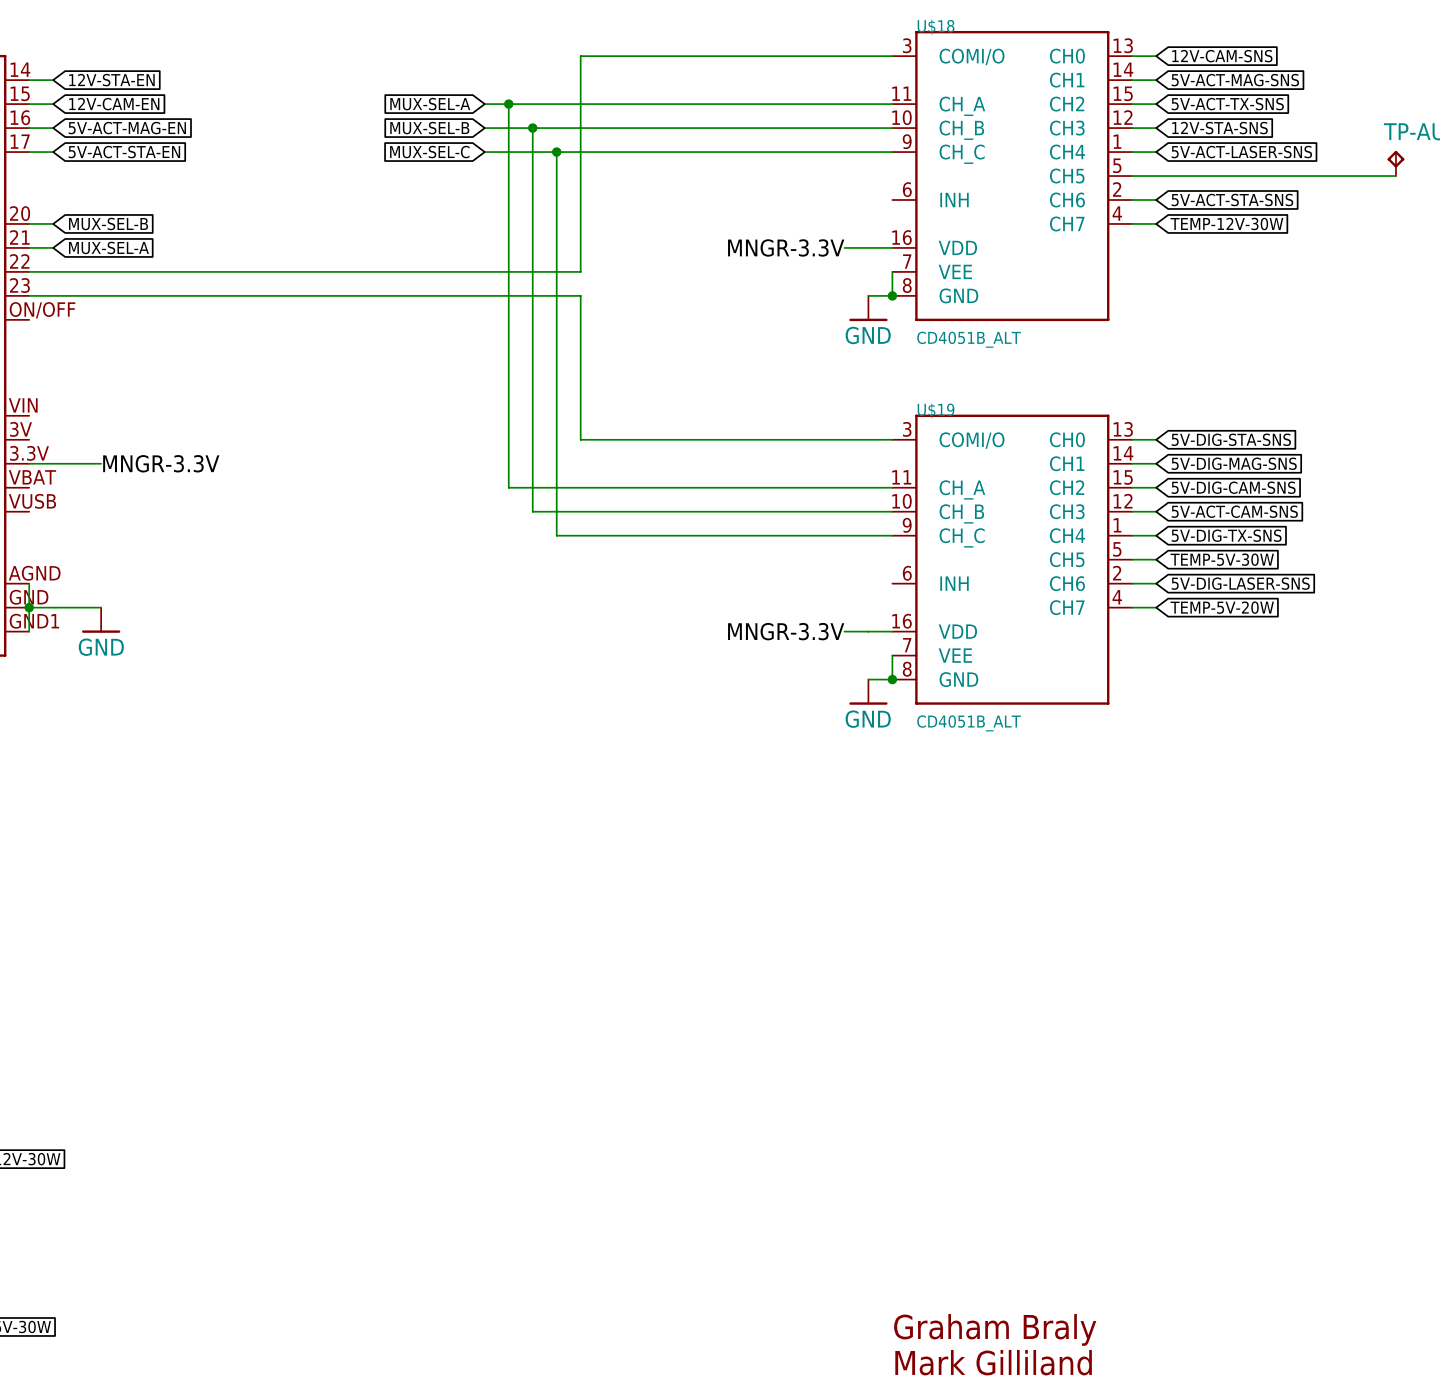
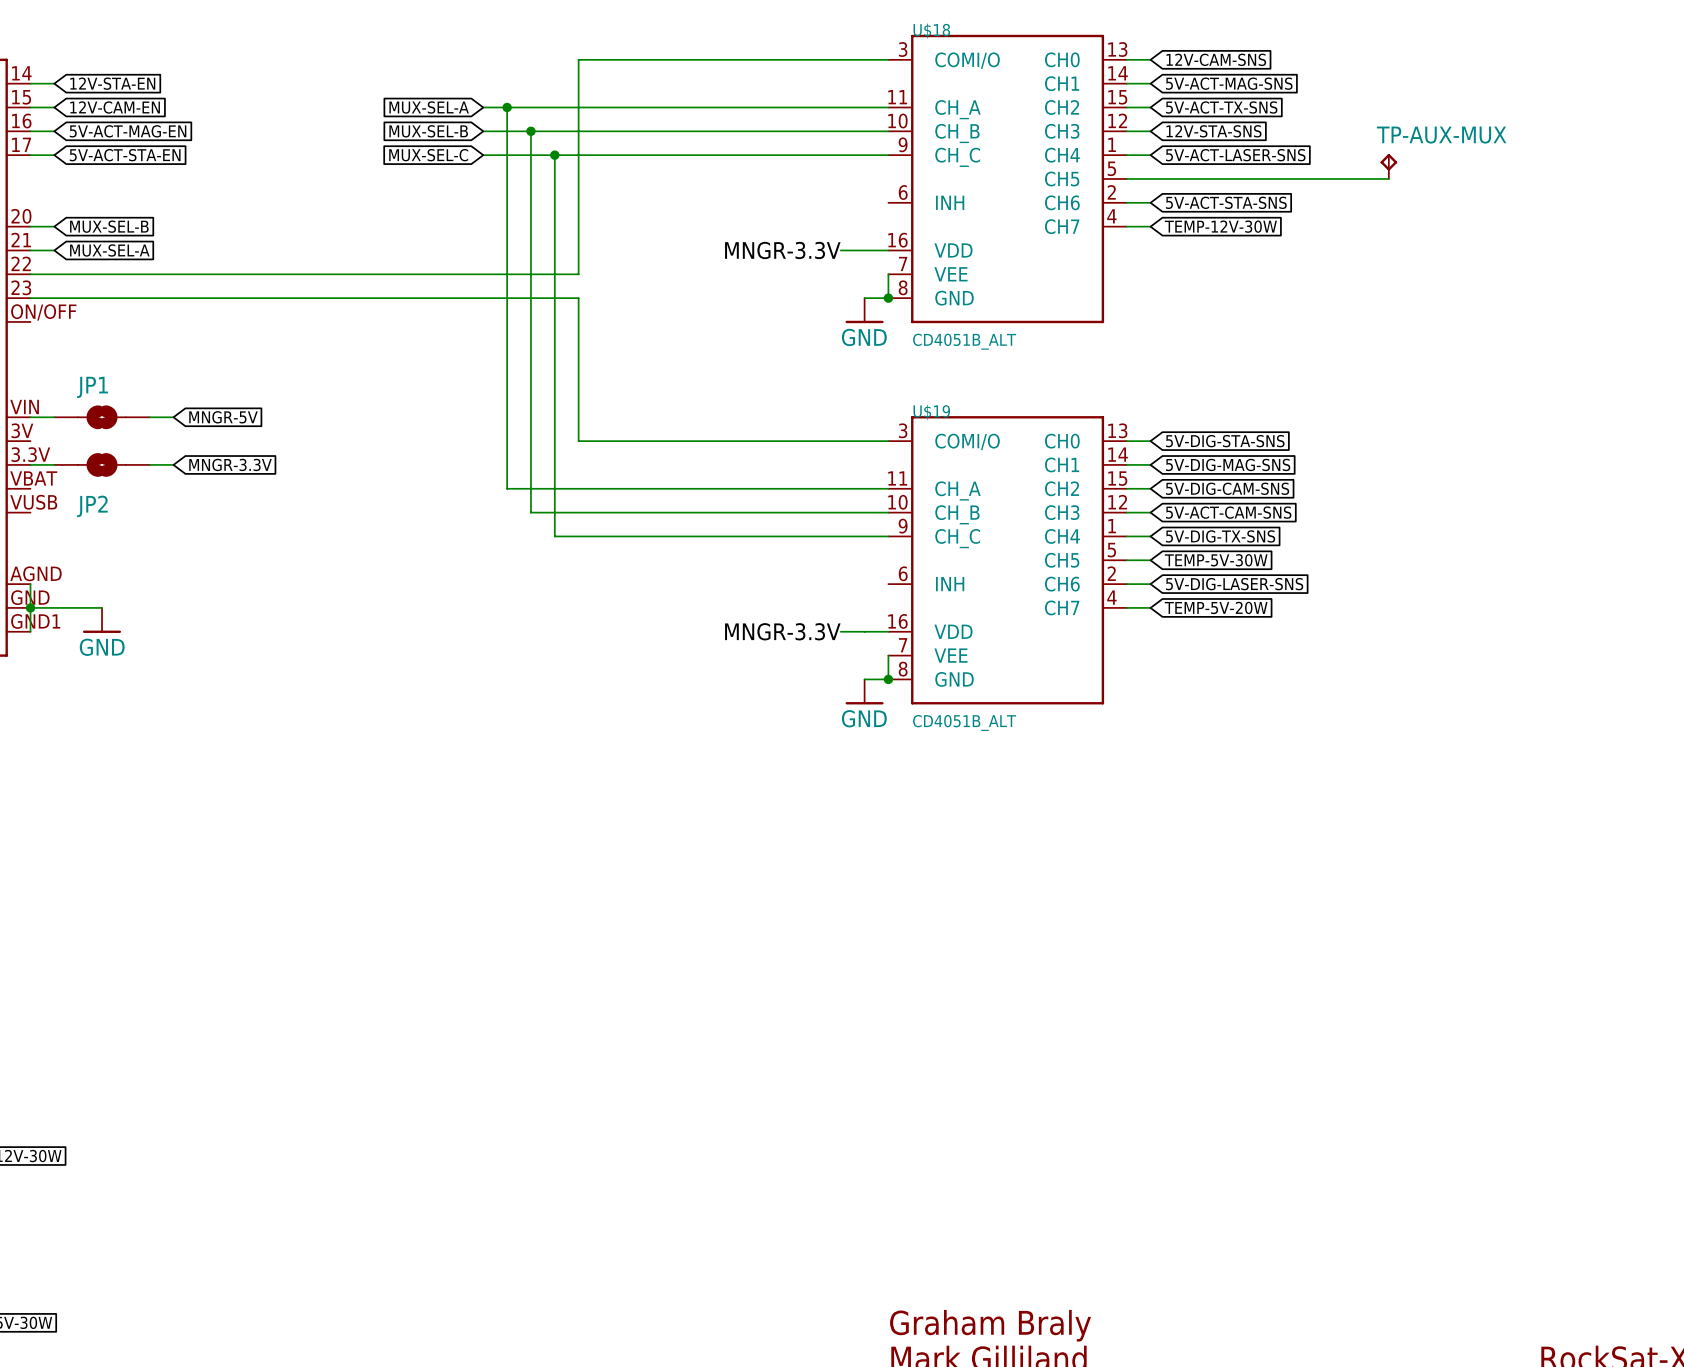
wire: none -> (30, 417) (54, 417)
JP1: none -> (102, 417)
wire: none -> (149, 417) (173, 417)
global label: none -> MNGR-5V (223, 417)
JP2: none -> (102, 464)
wire: none -> (149, 464) (173, 464)
label: MNGR-3.3V (161, 463) -> none
global label: none -> MNGR-3.3V (230, 464)

